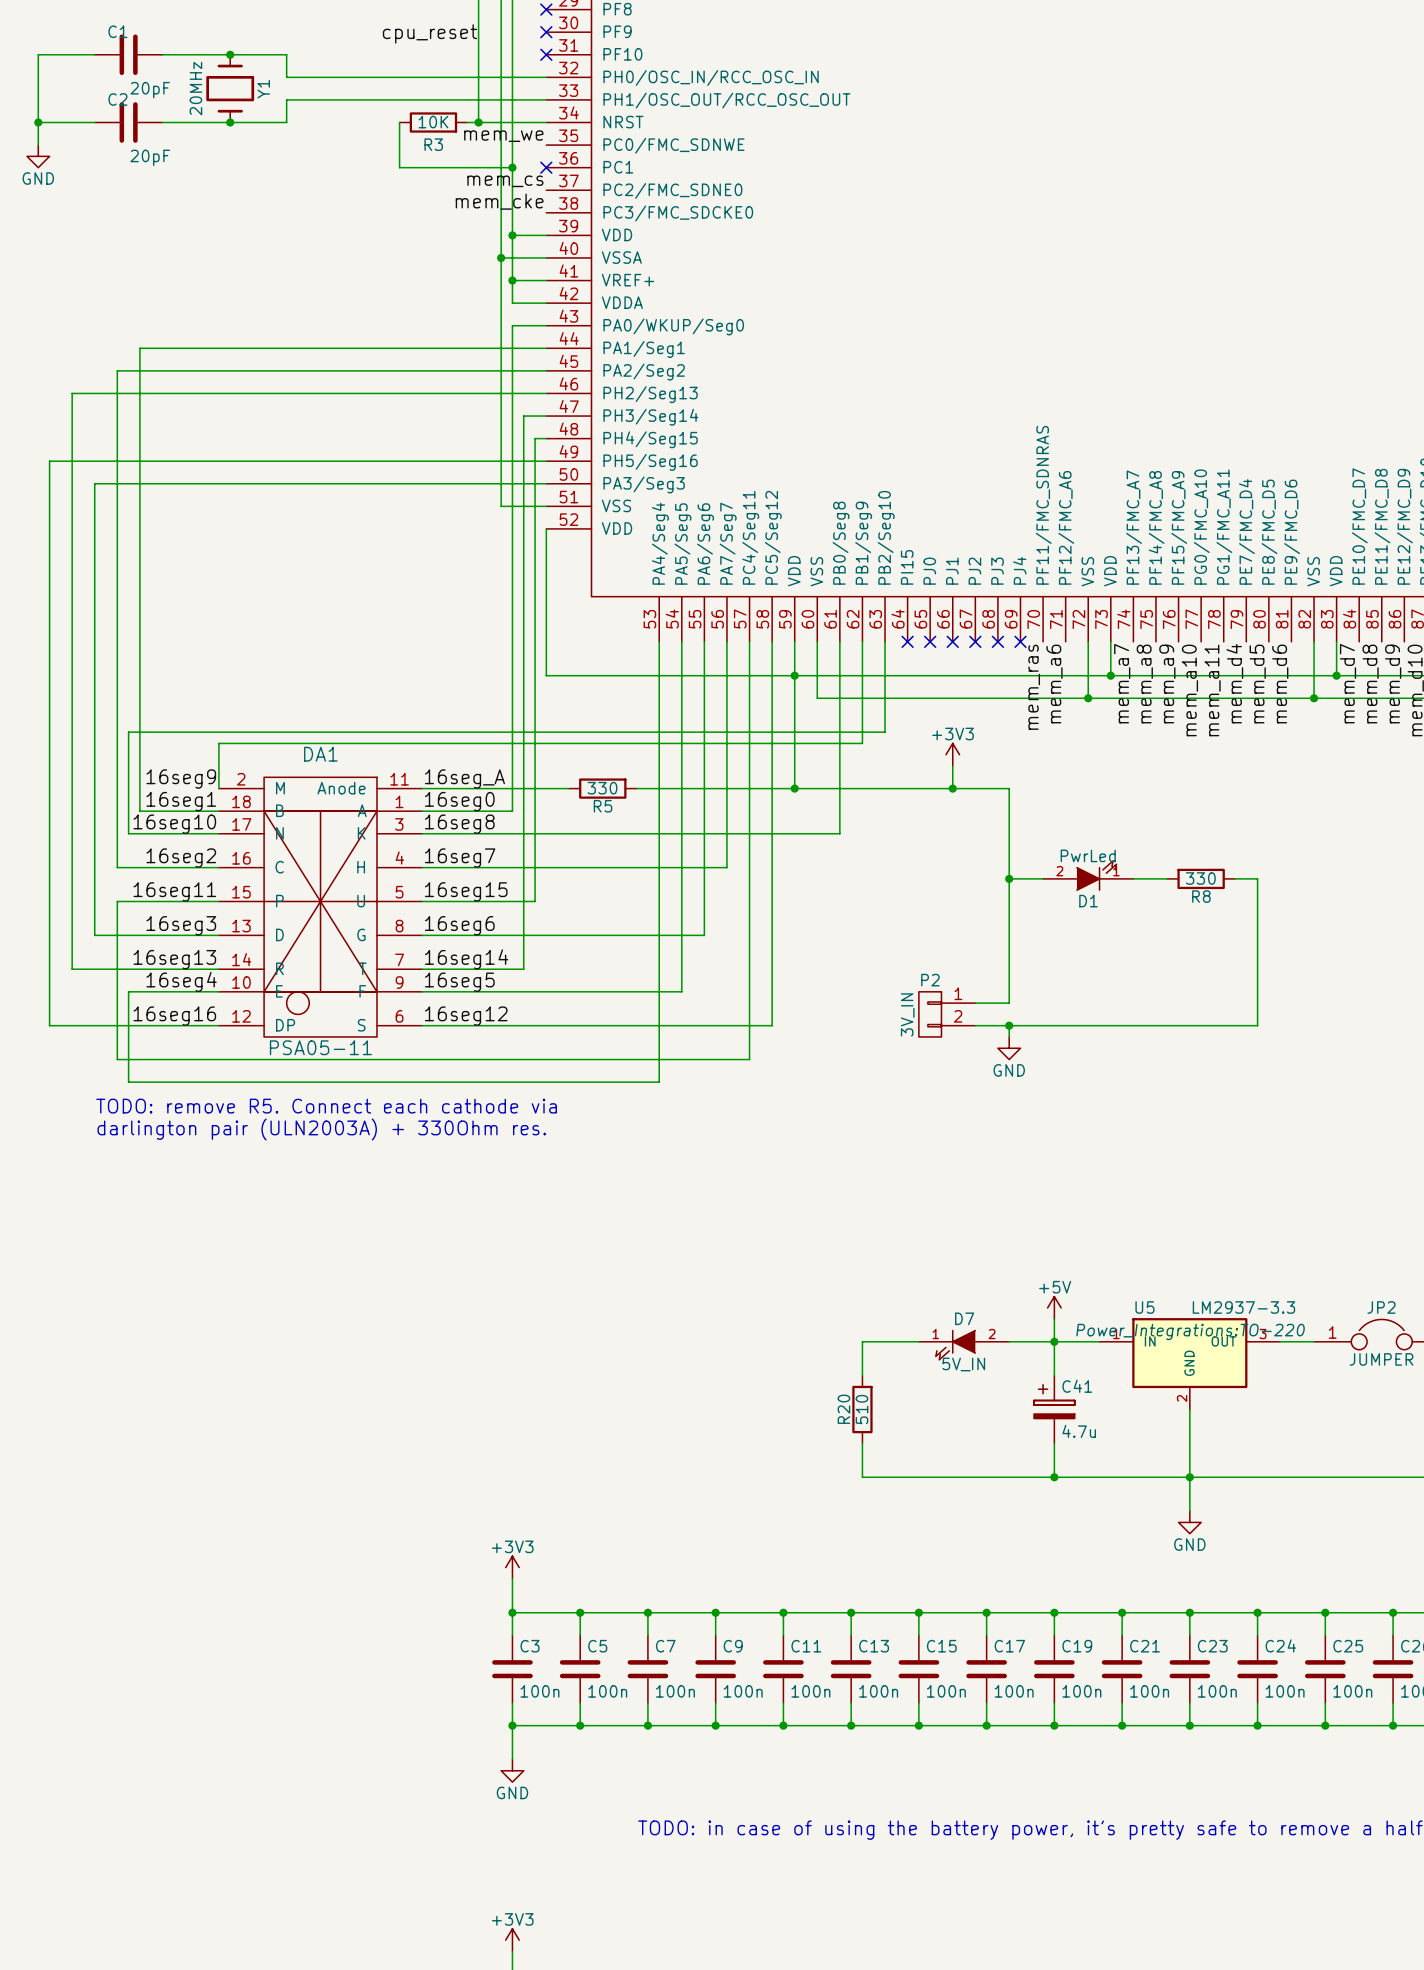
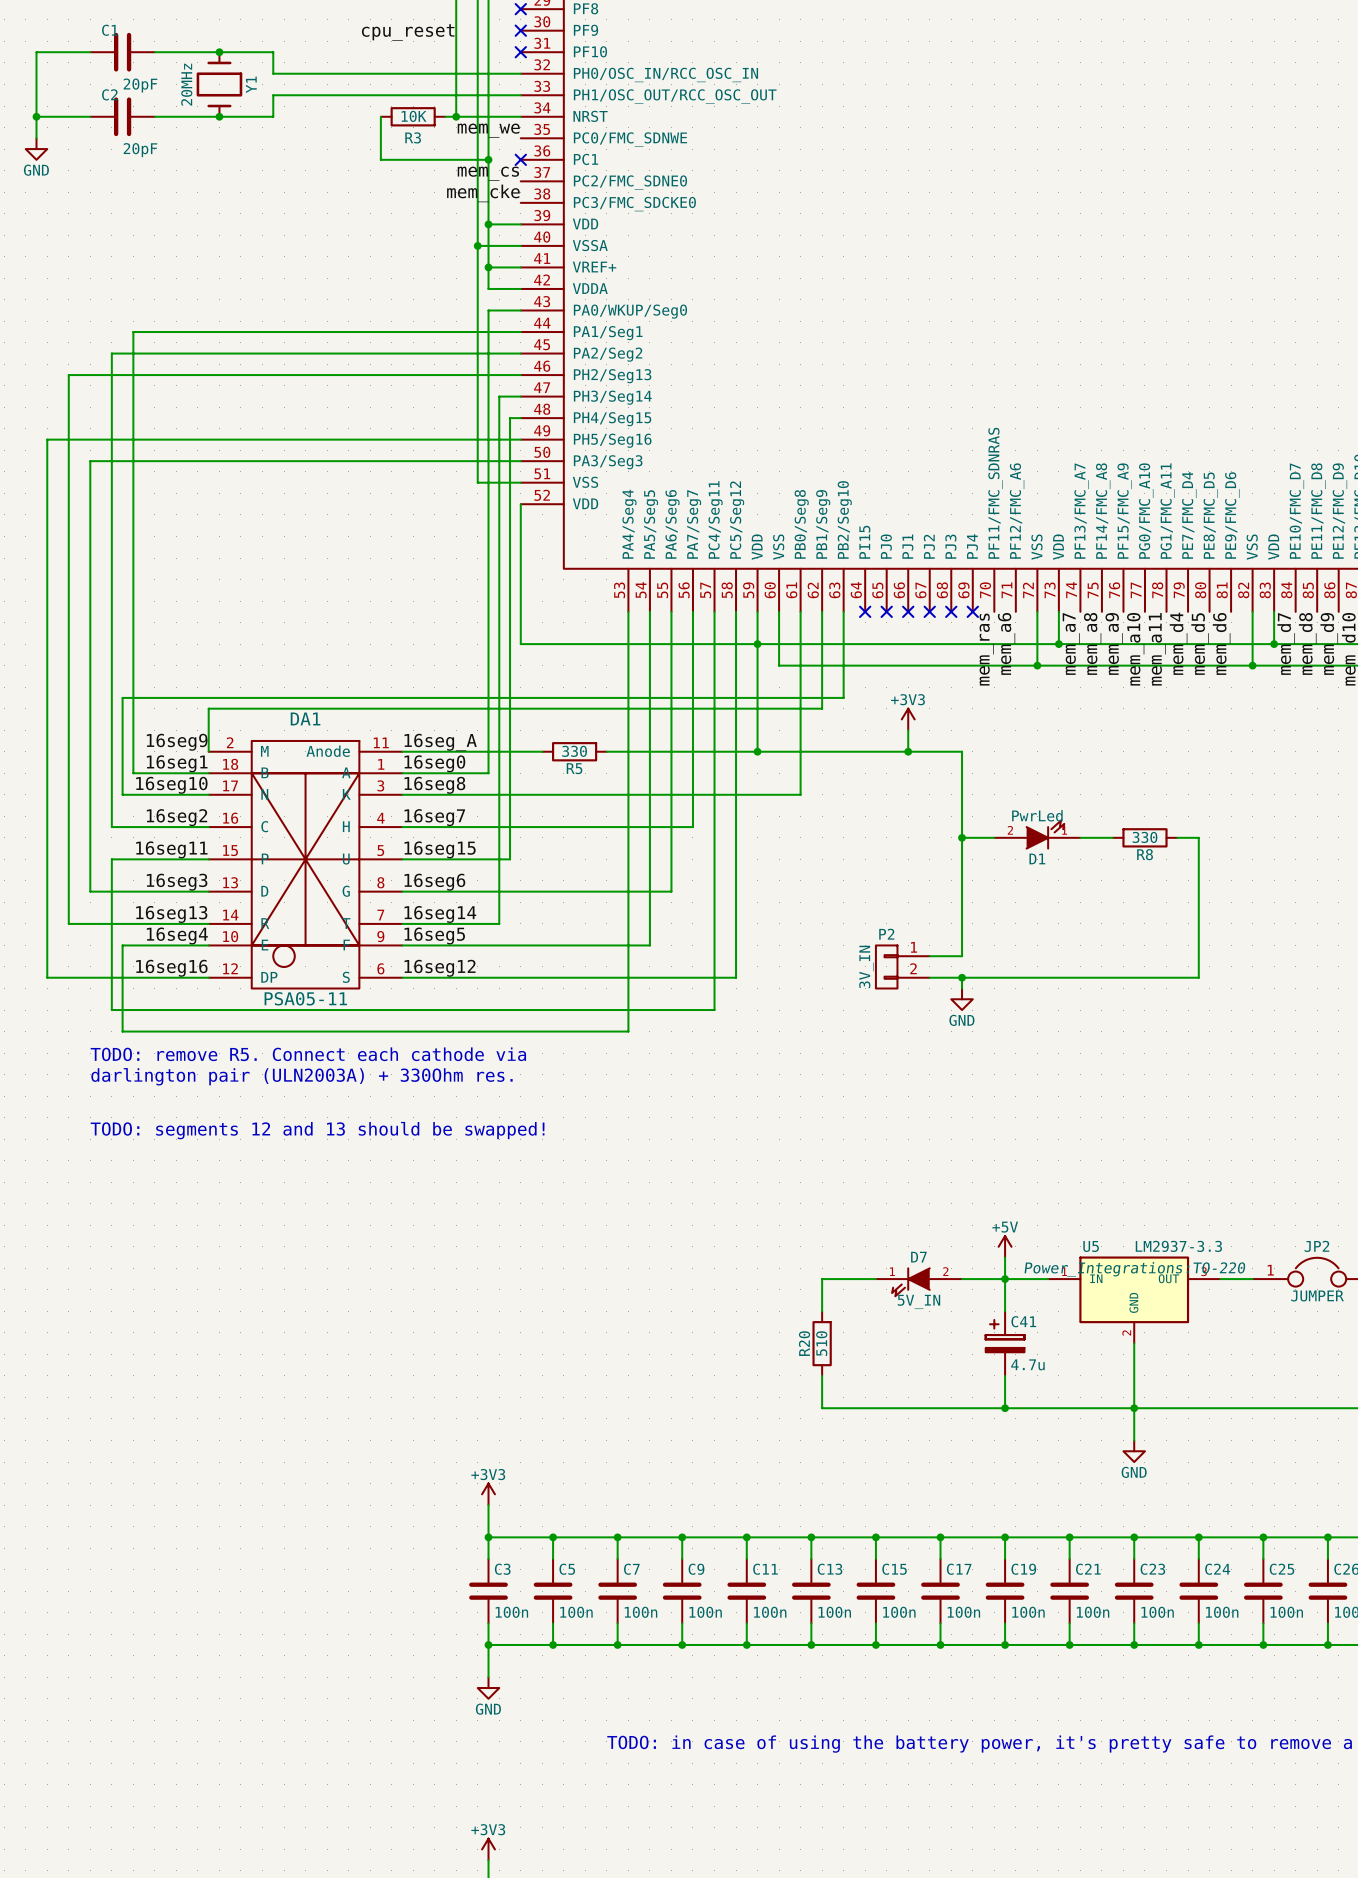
text: none -> TODO: segments 12 and 13 should be swapped! (317, 1130)

